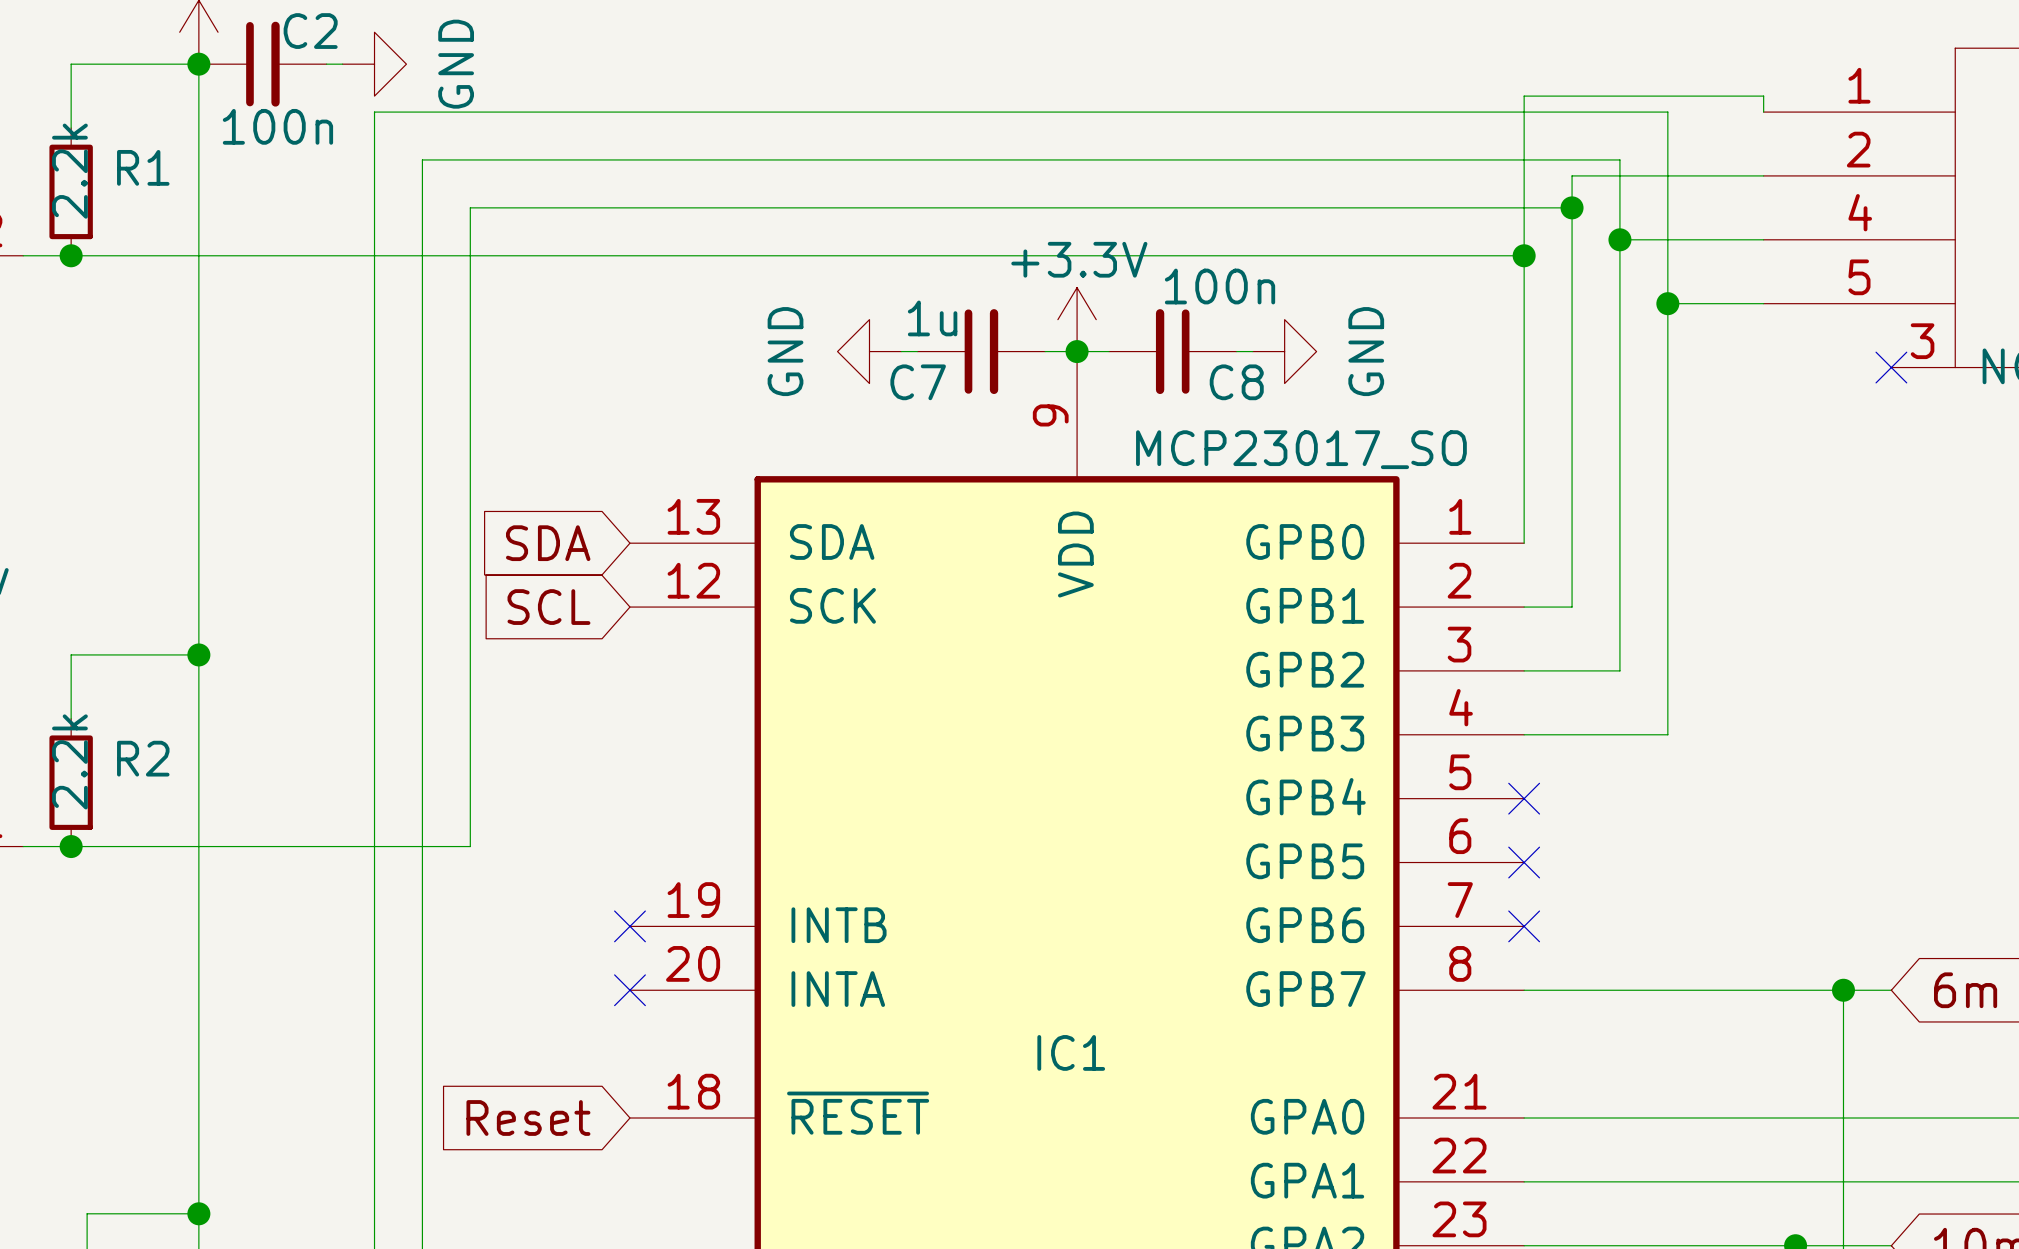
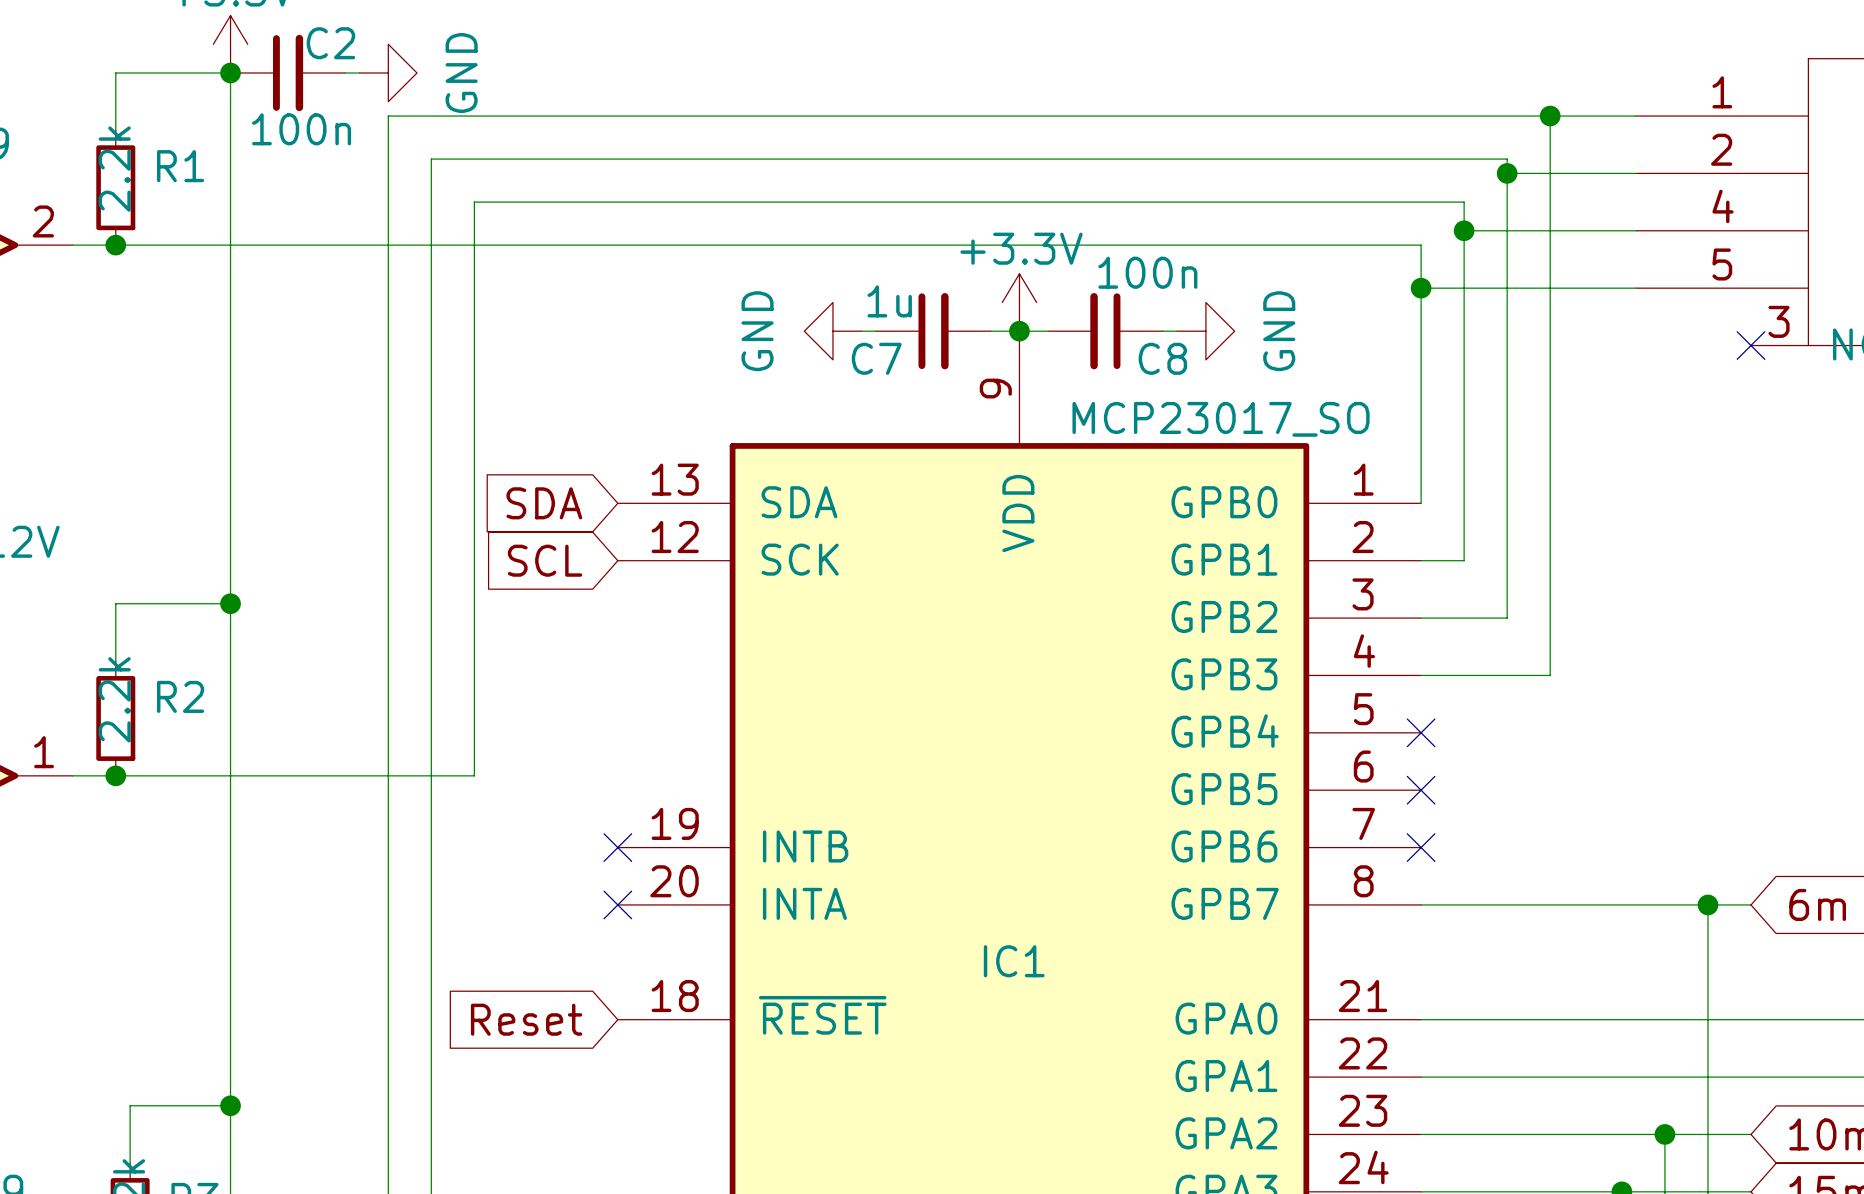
junction: none -> (1550, 116)
wire: (1763, 112) (1763, 96) (1524, 96) (1524, 255) -> (1636, 116) (1550, 116)
wire: (1619, 175) (1572, 175) (1572, 207) -> none
junction: none -> (1507, 173)
junction: (1572, 207) -> none
wire: none -> (1464, 230) (1507, 230)
junction: none -> (1464, 230)
junction: (1619, 239) -> none
junction: (1524, 255) -> none
wire: none -> (1421, 288) (1550, 288)
junction: none -> (1421, 288)
junction: (1667, 303) -> none

